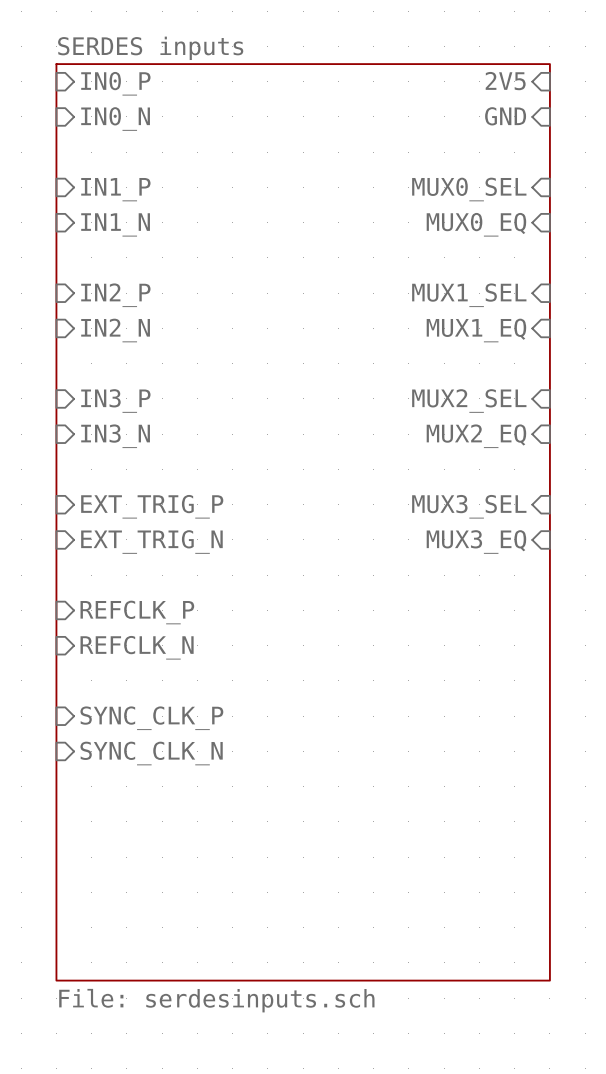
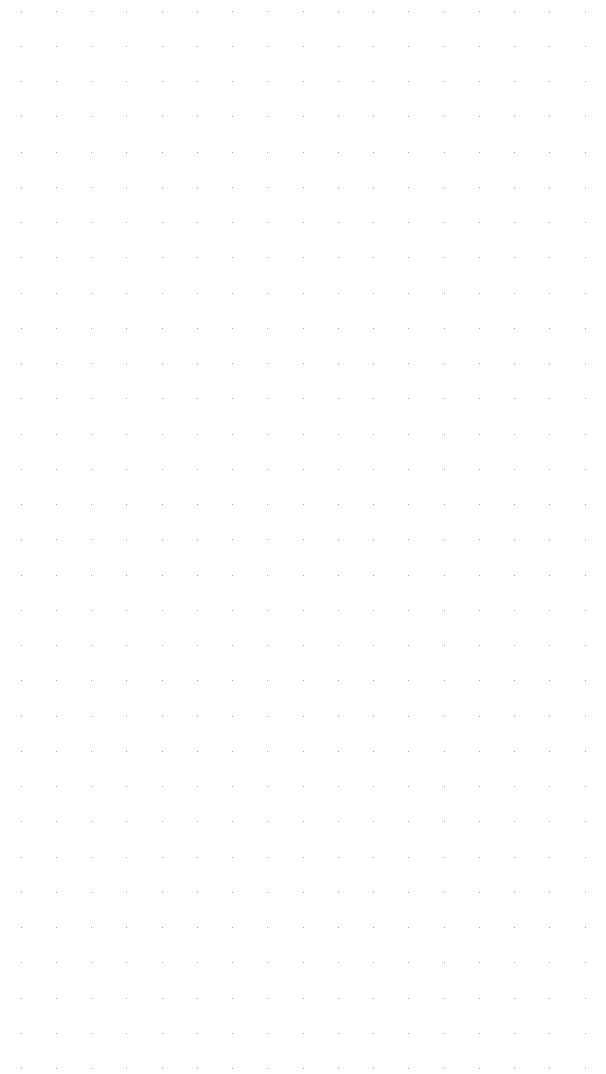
sheet pin: 2V5 (505, 81) -> none
sheet pin: IN0_P (115, 83) -> none
sheet pin: GND (505, 116) -> none
sheet pin: IN0_N (115, 118) -> none
sheet pin: IN1_P (115, 189) -> none
sheet pin: MUX0_SEL (469, 189) -> none
sheet pin: IN1_N (115, 224) -> none
sheet pin: MUX0_EQ (476, 224) -> none
sheet pin: IN2_P (115, 295) -> none
sheet pin: MUX1_SEL (469, 295) -> none
sheet pin: IN2_N (115, 330) -> none
sheet pin: MUX1_EQ (476, 330) -> none
sheet pin: IN3_P (115, 400) -> none
sheet pin: MUX2_SEL (469, 400) -> none
sheet pin: IN3_N (115, 436) -> none
sheet pin: MUX2_EQ (476, 436) -> none
sheet pin: EXT_TRIG_P (152, 506) -> none
sheet pin: MUX3_SEL (469, 506) -> none
sheet SERDES inputs: File: serdesinputs.sch (303, 522) -> none
sheet pin: EXT_TRIG_N (151, 542) -> none
sheet pin: MUX3_EQ (476, 542) -> none
sheet pin: REFCLK_P (137, 612) -> none
sheet pin: REFCLK_N (137, 647) -> none
sheet pin: SYNC_CLK_P (151, 718) -> none
sheet pin: SYNC_CLK_N (151, 753) -> none

